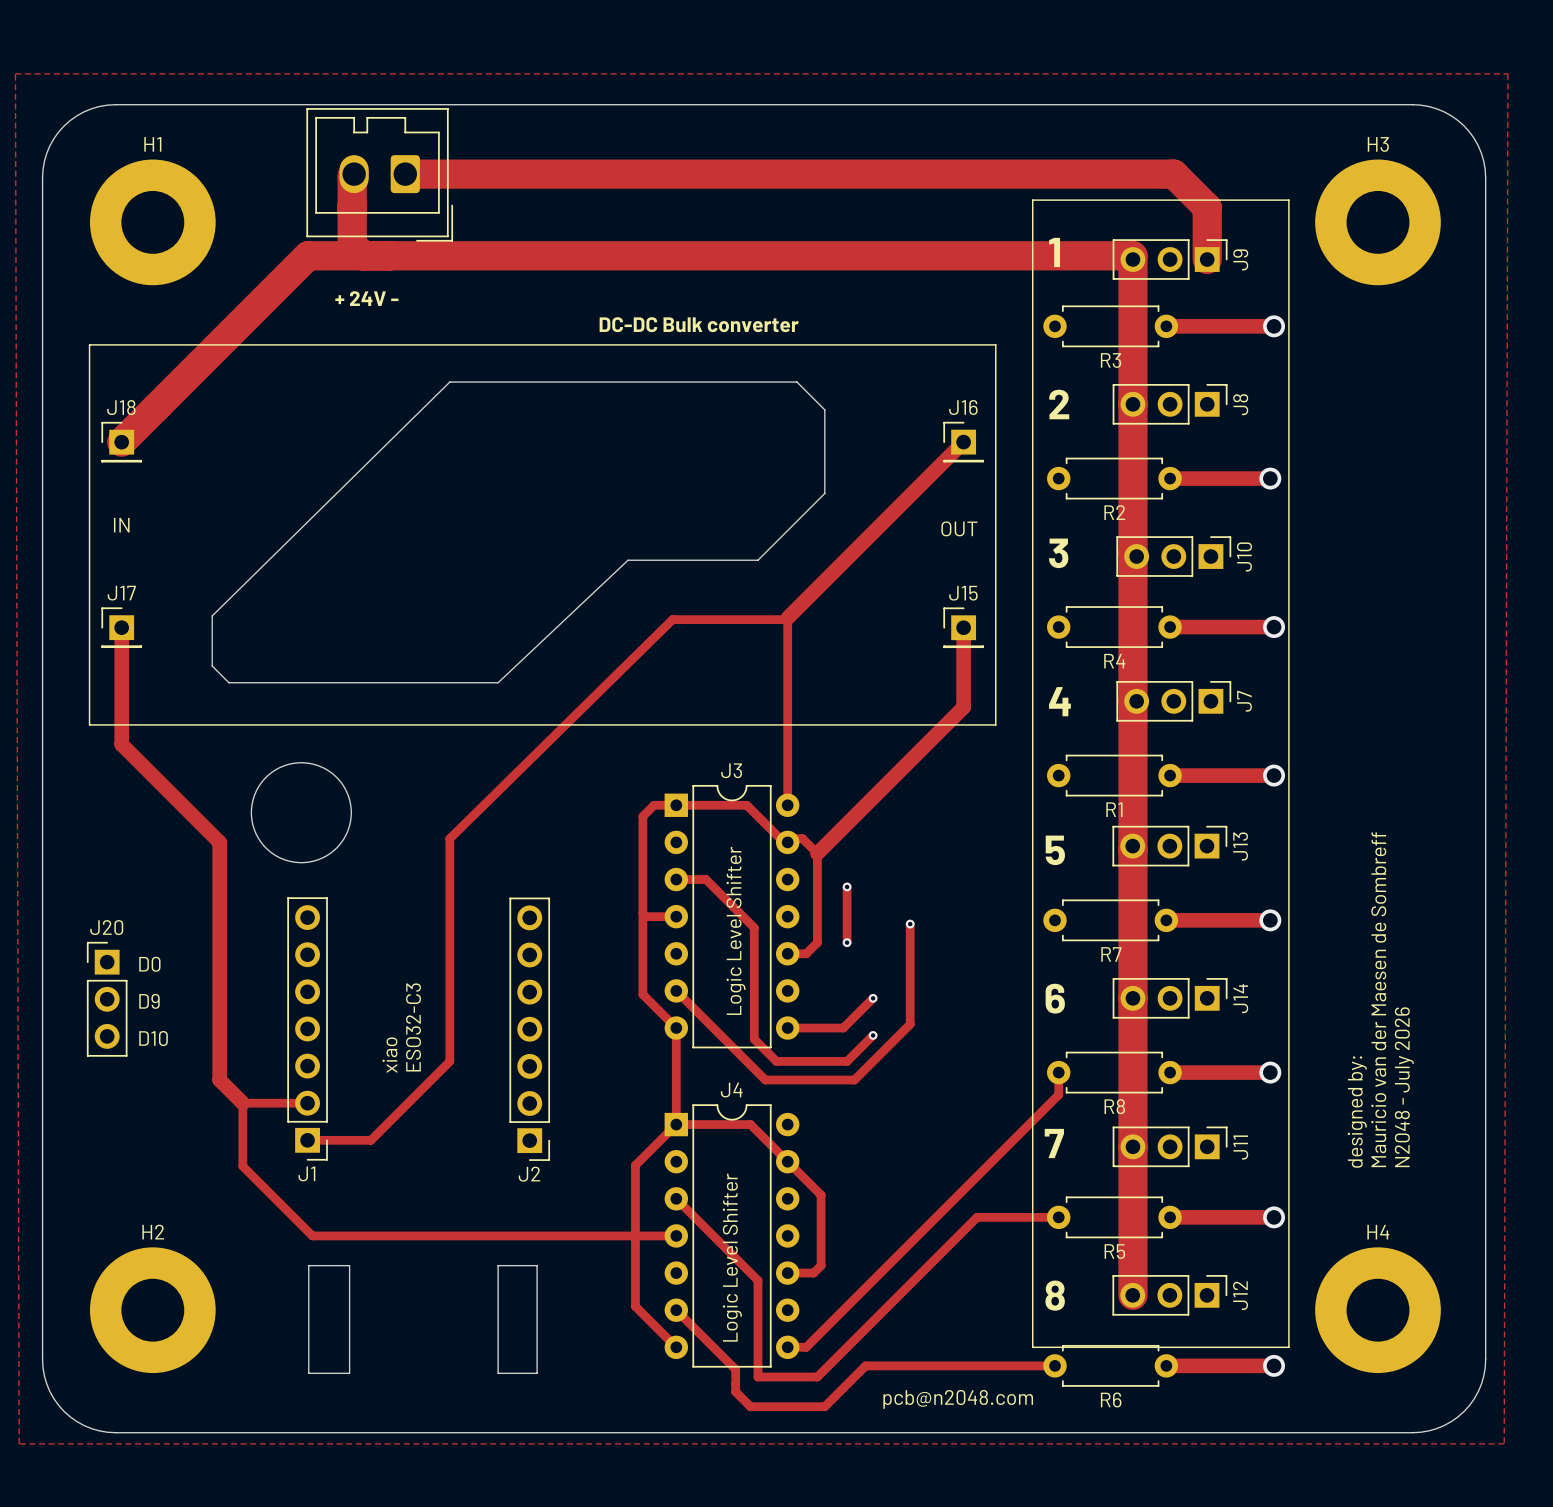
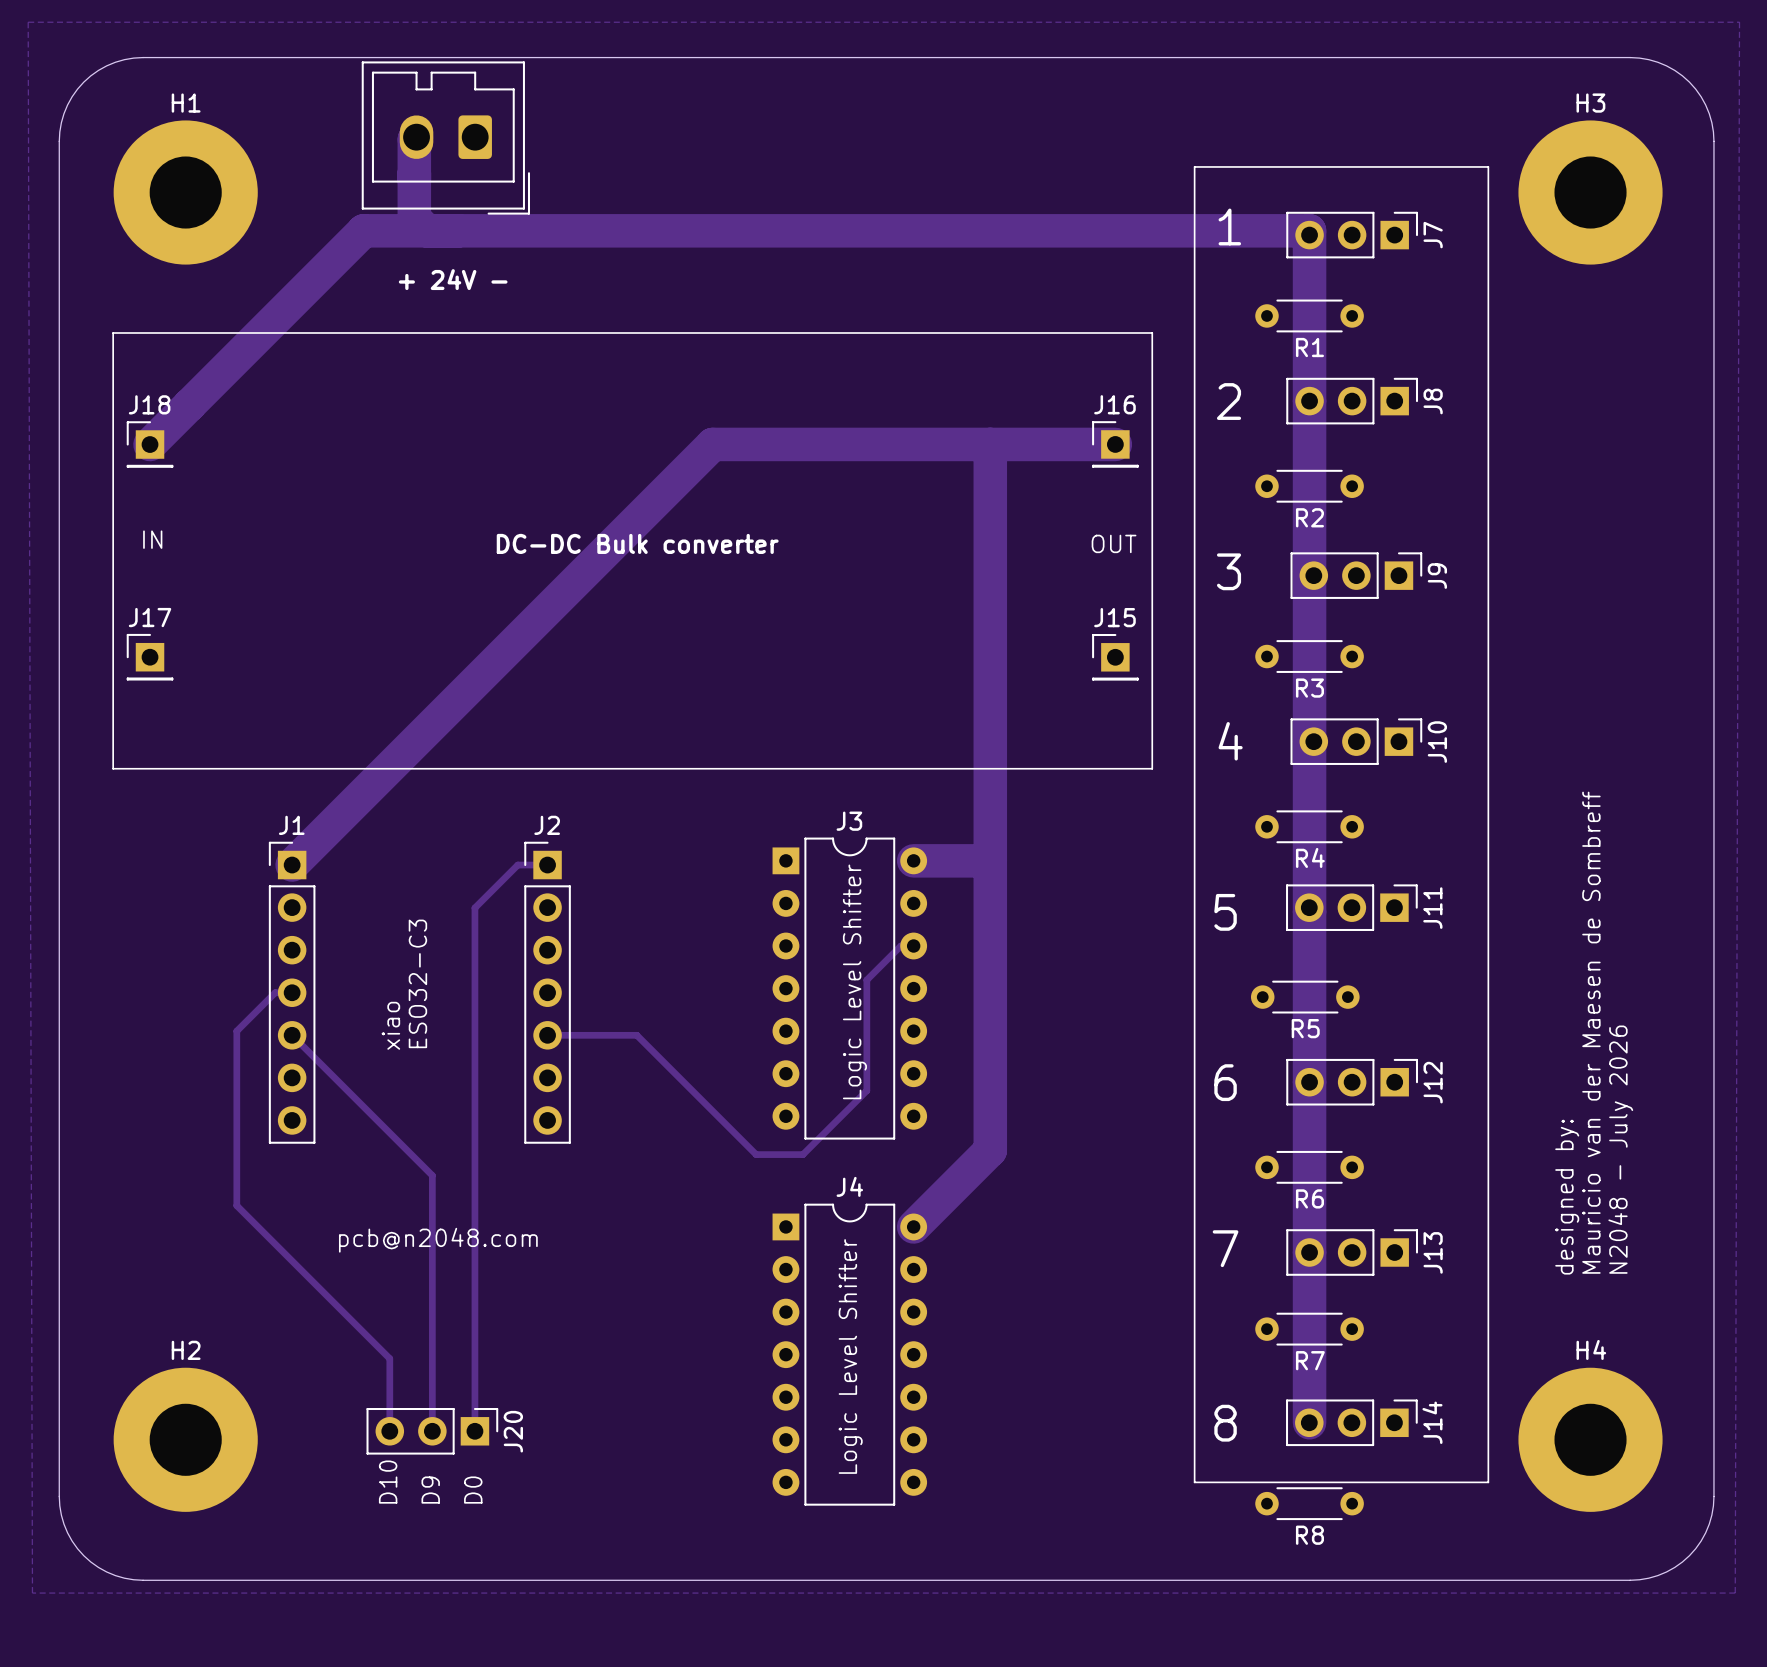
track: (405, 174) (1173, 174) (1207, 207) (1207, 259) -> none
J9 name: J9 (1240, 259) -> J7 (1433, 235)
R3 footprint: [1043, 305, 1179, 348] -> [1255, 640, 1364, 673]
text position: DC-DC Bulk converter (699, 324) -> DC-DC Bulk converter (637, 543)
track: (1166, 326) (1274, 326) -> none
via: (1274, 326) -> none
board edge: (449, 382) (212, 615) (212, 666) (228, 682) (498, 682) (628, 560) (757, 560) (824, 493) (824, 409) (796, 382) (449, 382) -> none
track: none -> (990, 444) (990, 1150) (913, 1226)
track: (963, 442) (787, 618) -> (1115, 444) (712, 444) (292, 865)
R2 footprint: [1047, 457, 1182, 500] -> [1255, 469, 1364, 503]
track: (1170, 478) (1270, 478) -> none
via: (1270, 478) -> none
J10 name: J10 (1244, 556) -> J9 (1437, 576)
R4 footprint: [1047, 606, 1182, 648] -> [1255, 810, 1364, 844]
track: (787, 618) (787, 805) -> (990, 860) (913, 860)
track: (787, 618) (787, 619) (672, 619) (449, 838) (449, 1061) (370, 1140) (307, 1140) -> none
track: (121, 627) (121, 744) (219, 842) (219, 1080) (242, 1103) -> none
track: (963, 627) (963, 707) (817, 853) -> none
track: (1170, 627) (1274, 627) -> none
via: (1274, 627) -> none
J7 name: J7 (1244, 701) -> J10 (1437, 742)
R1 footprint: [1047, 754, 1182, 797] -> [1255, 299, 1364, 333]
round board edge: [251, 762, 352, 864] -> none
track: (1170, 775) (1274, 775) -> none
via: (1274, 775) -> none
track: none -> (547, 865) (517, 865) (474, 907) (474, 1431)
J13 name: J13 (1240, 846) -> J11 (1432, 908)
track: (817, 853) (817, 942) (806, 953) (787, 953) -> none
track: (817, 853) (802, 838) (791, 838) (787, 842) (783, 842) (746, 805) (654, 805) (642, 816) (642, 994) (676, 1028) (676, 1124) -> none
track: (676, 879) (706, 879) (754, 927) (754, 1039) (776, 1061) (847, 1061) (873, 1035) -> none
track: none -> (913, 946) (900, 946) (866, 980) (866, 1090) (802, 1154) (756, 1154) (636, 1035) (547, 1035)
track: (847, 886) (847, 942) -> none
via: (847, 886) -> none
R7 footprint: [1043, 899, 1179, 942] -> [1255, 1312, 1364, 1346]
track: (642, 912) (646, 916) (676, 916) -> none
track: none -> (292, 992) (275, 992) (236, 1031) (236, 1205) (389, 1358) (389, 1431)
track: (1166, 920) (1270, 920) -> none
via: (1270, 920) -> none
track: (910, 924) (910, 1024) (854, 1080) (765, 1080) (676, 990) -> none
via: (910, 924) -> none
via: (847, 942) -> none
track: none -> (292, 1035) (432, 1175) (432, 1431)
text: D0 (149, 964) -> none
track: (873, 998) (843, 1028) (787, 1028) -> none
via: (873, 998) -> none
J14 name: J14 (1240, 998) -> J12 (1433, 1082)
J20 rotation: 0° (107, 999) -> 90° clockwise (432, 1431)
J20 position: (107, 999) -> (432, 1431)
text: D9 (149, 1001) -> none
text position: ESO32-C3 (413, 1027) -> ESO32-C3 (417, 983)
J1 rotation: 0° (307, 1028) -> 180° (292, 992)
J2 rotation: 0° (529, 1029) -> 180° (547, 992)
via: (873, 1035) -> none
text: D10 (153, 1038) -> none
R8 footprint: [1047, 1051, 1182, 1094] -> [1255, 1487, 1364, 1521]
text position: xiao (389, 1055) -> xiao (390, 1025)
track: (1058, 1072) (1058, 1094) (806, 1347) (787, 1347) -> none
track: (1170, 1072) (1270, 1072) -> none
via: (1270, 1072) -> none
track: (242, 1103) (307, 1103) -> none
track: (242, 1103) (242, 1166) (312, 1235) (676, 1235) -> none
track: (676, 1124) (635, 1165) (635, 1306) (676, 1347) -> none
track: (676, 1124) (750, 1124) (821, 1195) (821, 1265) (813, 1273) (787, 1273) -> none
text: none -> pcb@n2048.com (438, 1240)
J11 name: J11 (1240, 1147) -> J13 (1433, 1252)
R5 footprint: [1047, 1196, 1182, 1239] -> [1251, 980, 1360, 1014]
track: (676, 1198) (757, 1280) (757, 1377) (817, 1377) (977, 1217) (1058, 1217) -> none
track: (1170, 1217) (1274, 1217) -> none
via: (1274, 1217) -> none
board edge: (308, 1265) (349, 1265) (349, 1373) (308, 1373) (308, 1265) -> none
board edge: (498, 1265) (537, 1265) (537, 1373) (498, 1373) (498, 1265) -> none
J12 name: J12 (1240, 1295) -> J14 (1432, 1422)
track: (676, 1310) (735, 1369) (735, 1391) (750, 1406) (824, 1406) (865, 1365) (1055, 1365) -> none
R6 footprint: [1043, 1344, 1179, 1387] -> [1255, 1150, 1364, 1184]
text: none -> D10 (388, 1482)
text: none -> D9 (430, 1490)
text: none -> D0 (473, 1490)
track: (1166, 1365) (1274, 1365) -> none
via: (1274, 1365) -> none
text: pcb@n2048.com (958, 1399) -> none

